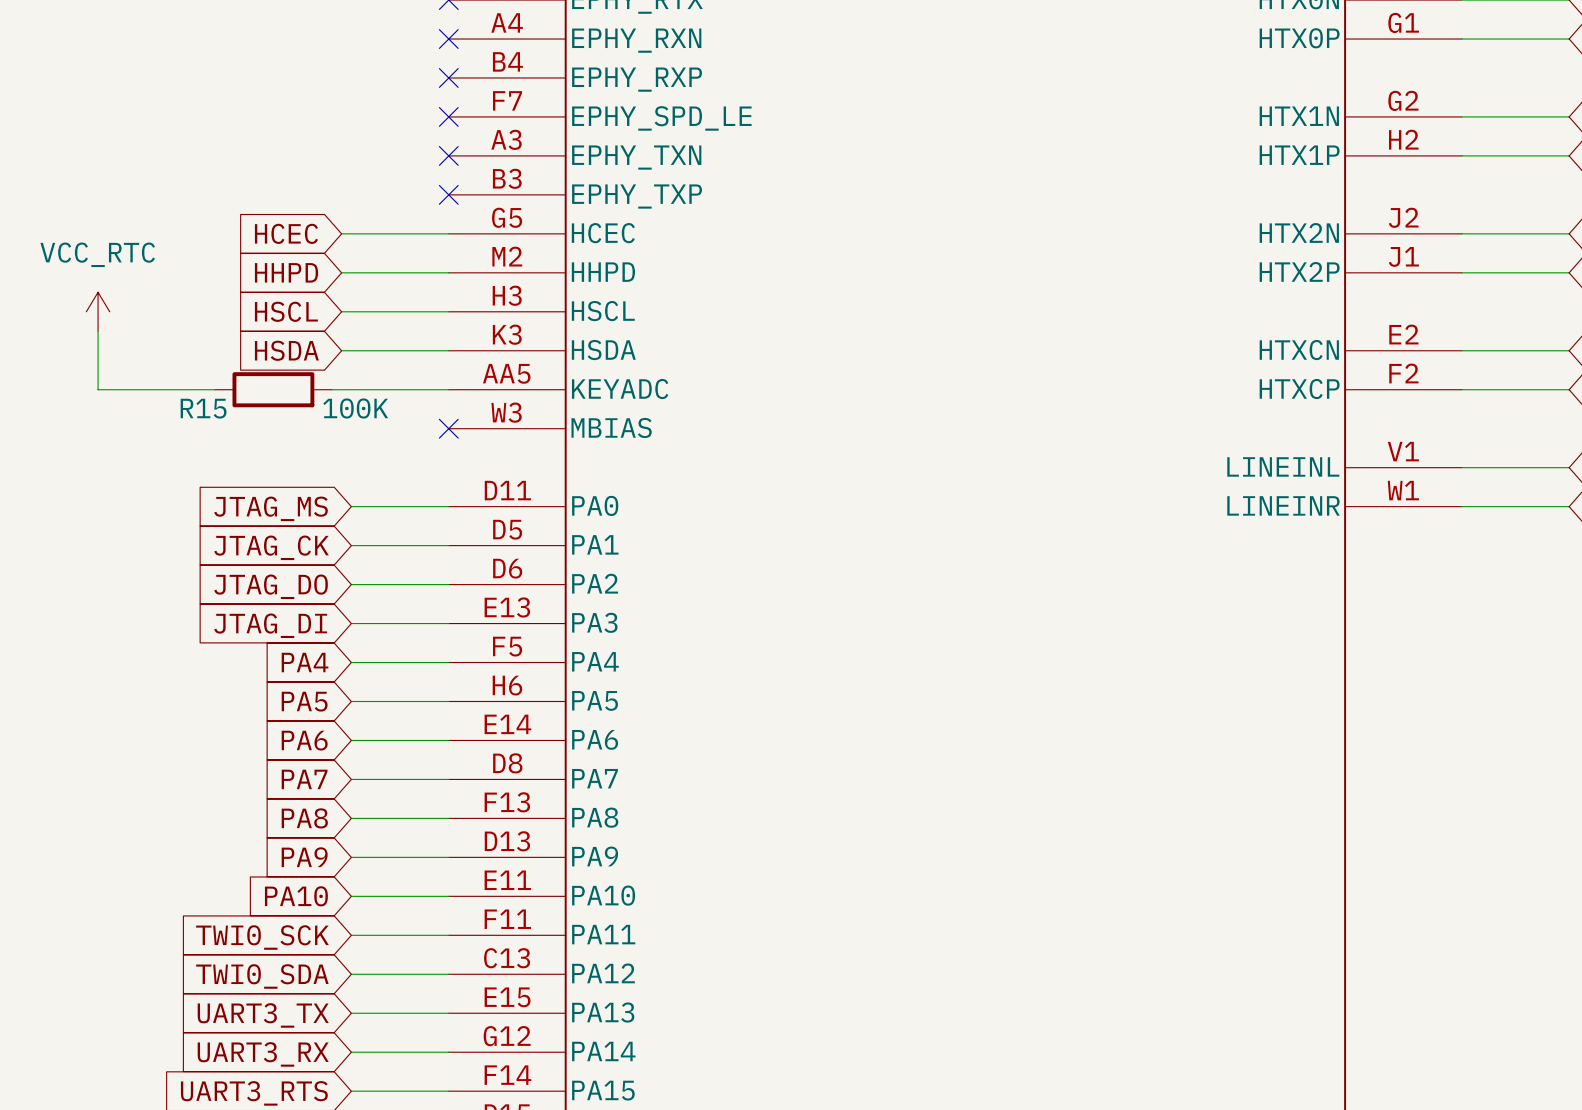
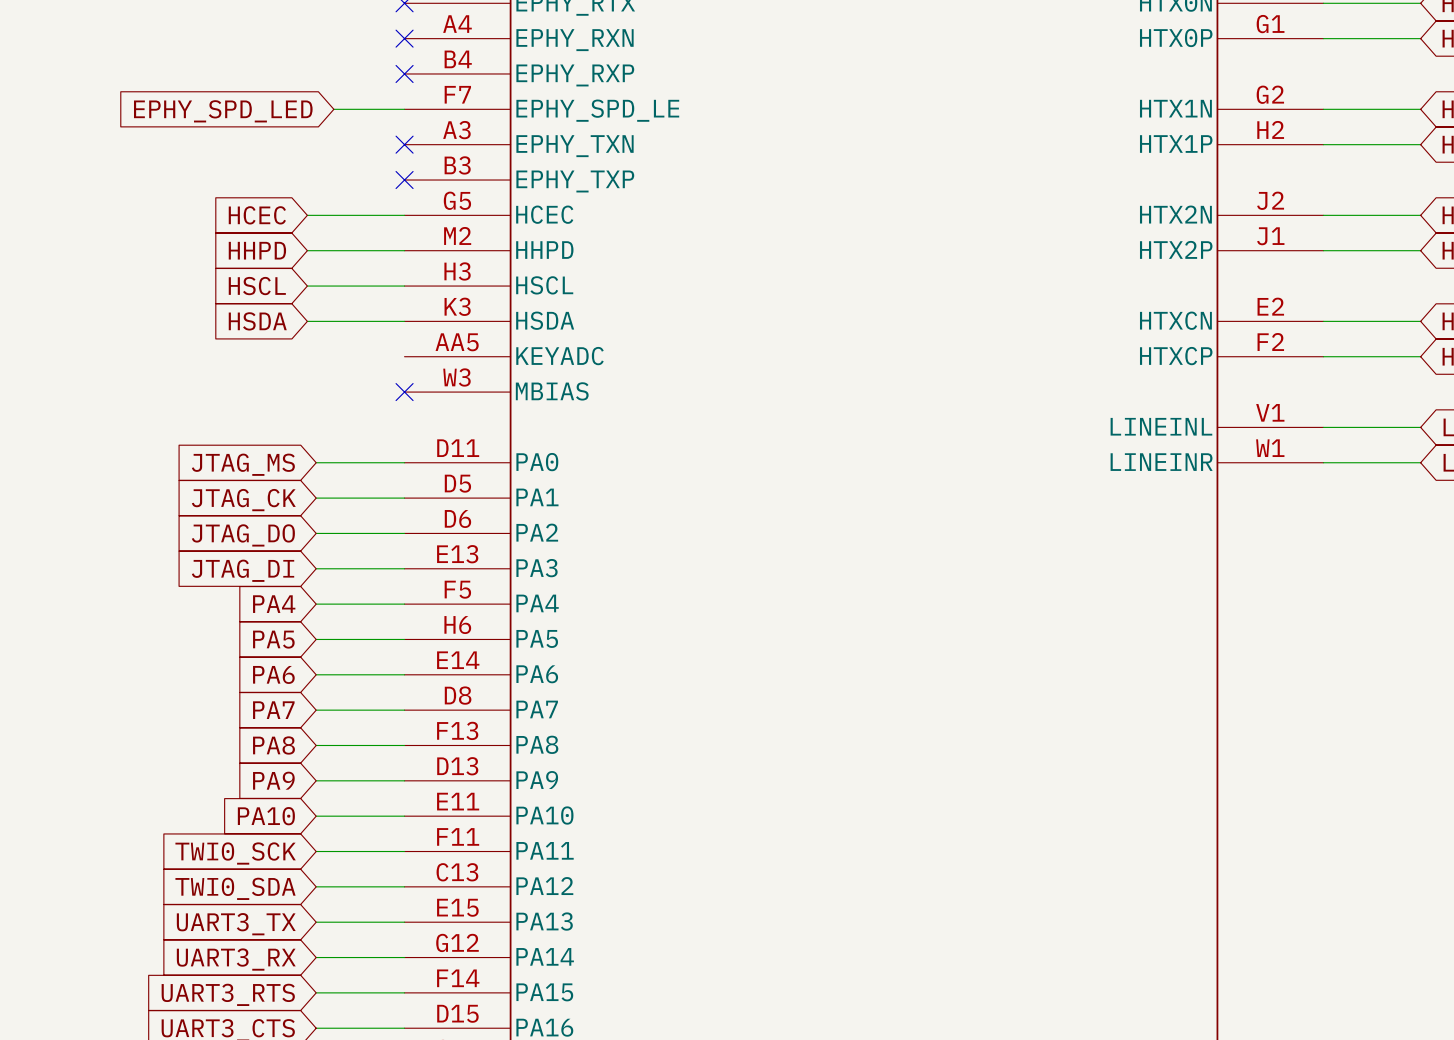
wire: none -> (333, 109) (404, 109)
no-connect mark: (448, 116) -> none
global label: none -> EPHY_SPD_LED (223, 111)
power symbol: VCC_RTC (98, 311) -> none
wire: (98, 331) (98, 389) (214, 389) -> none
R15: 100K (273, 389) -> none
wire: (331, 389) (448, 389) -> none

